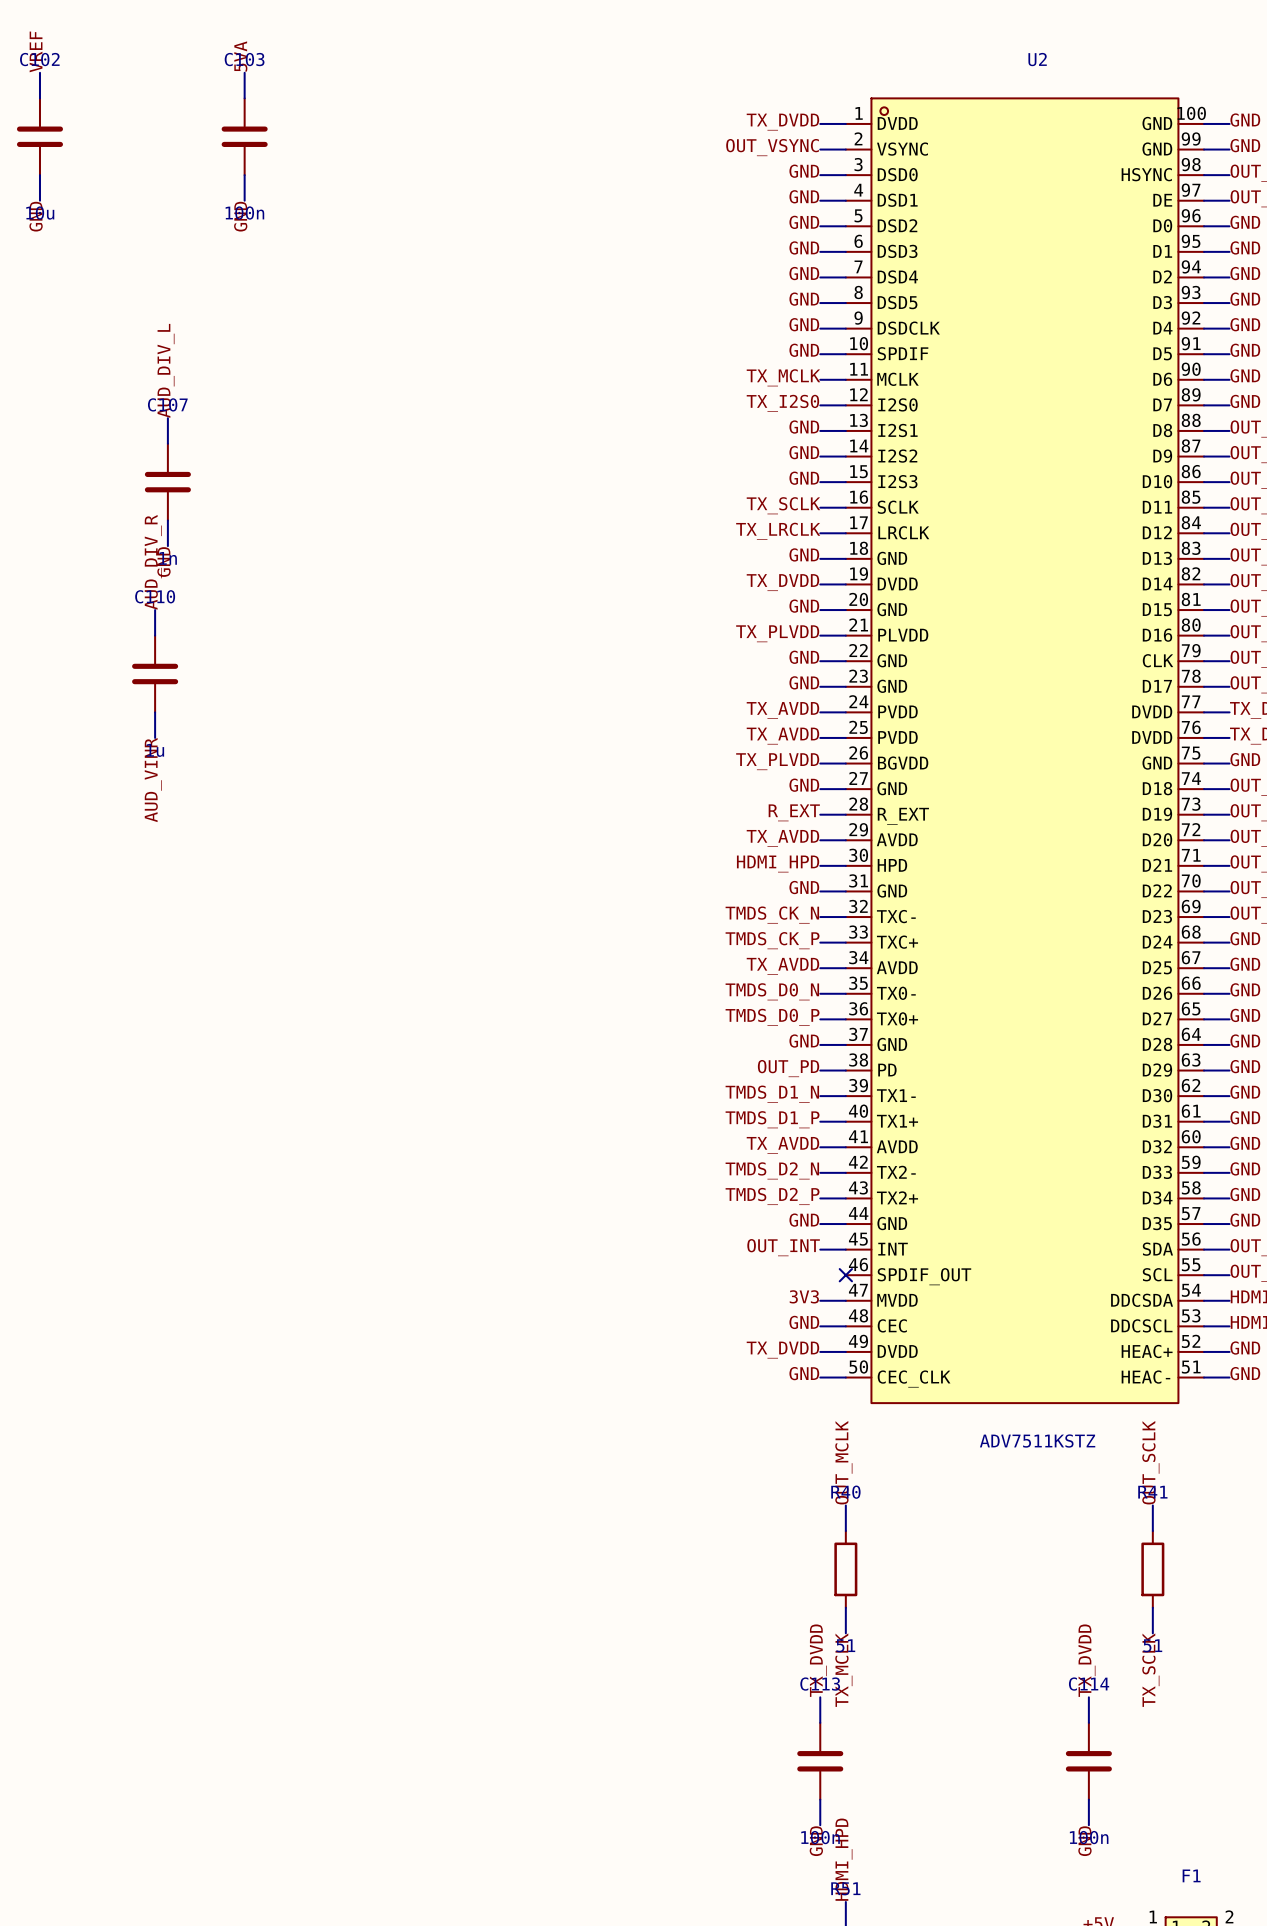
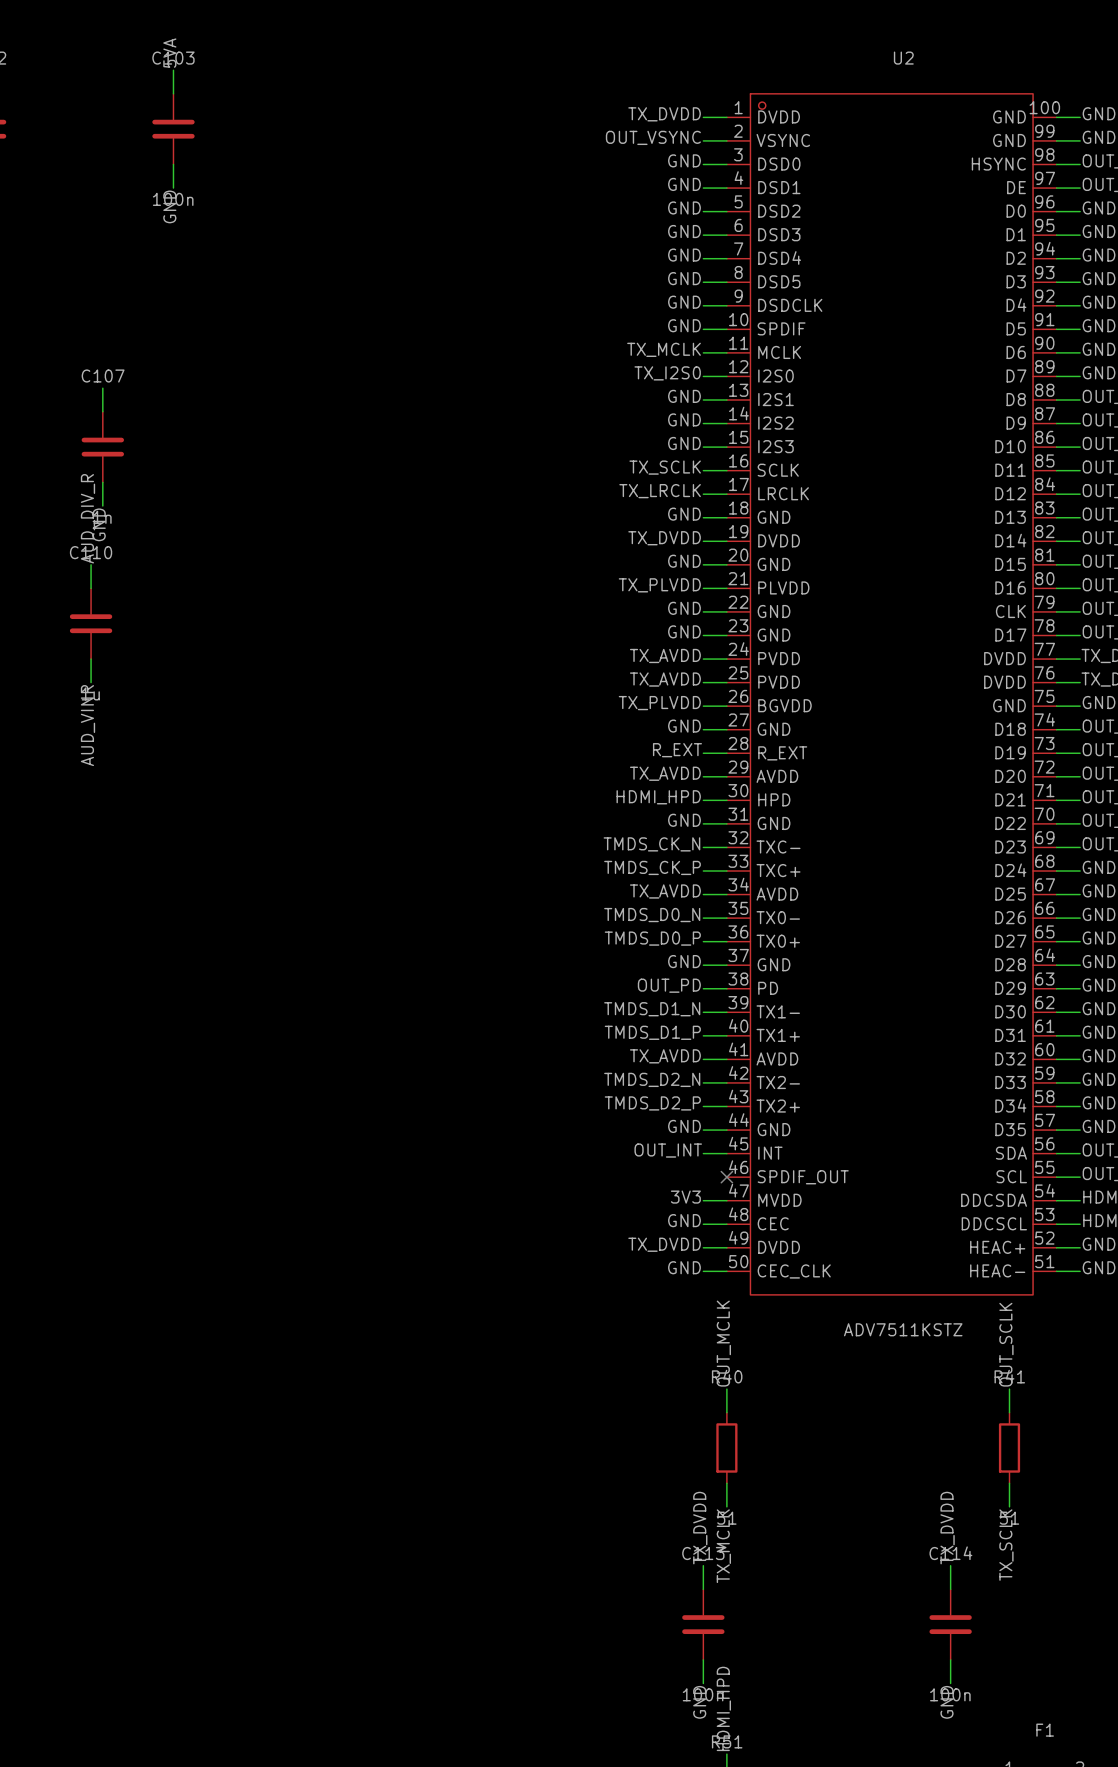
label: AUD_DIV_L (166, 370) -> none

